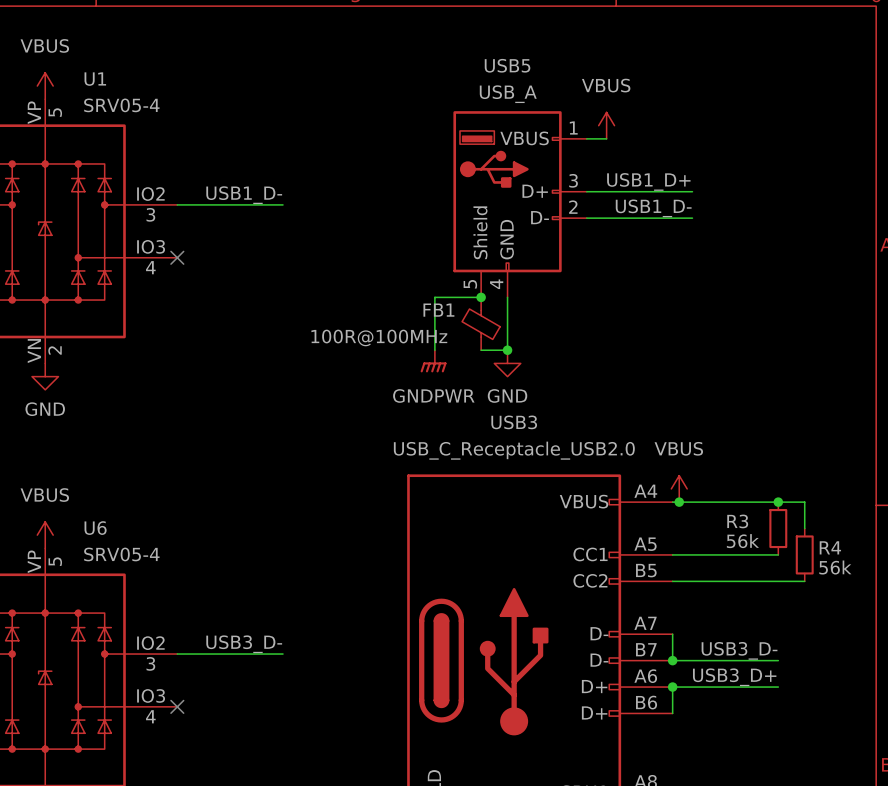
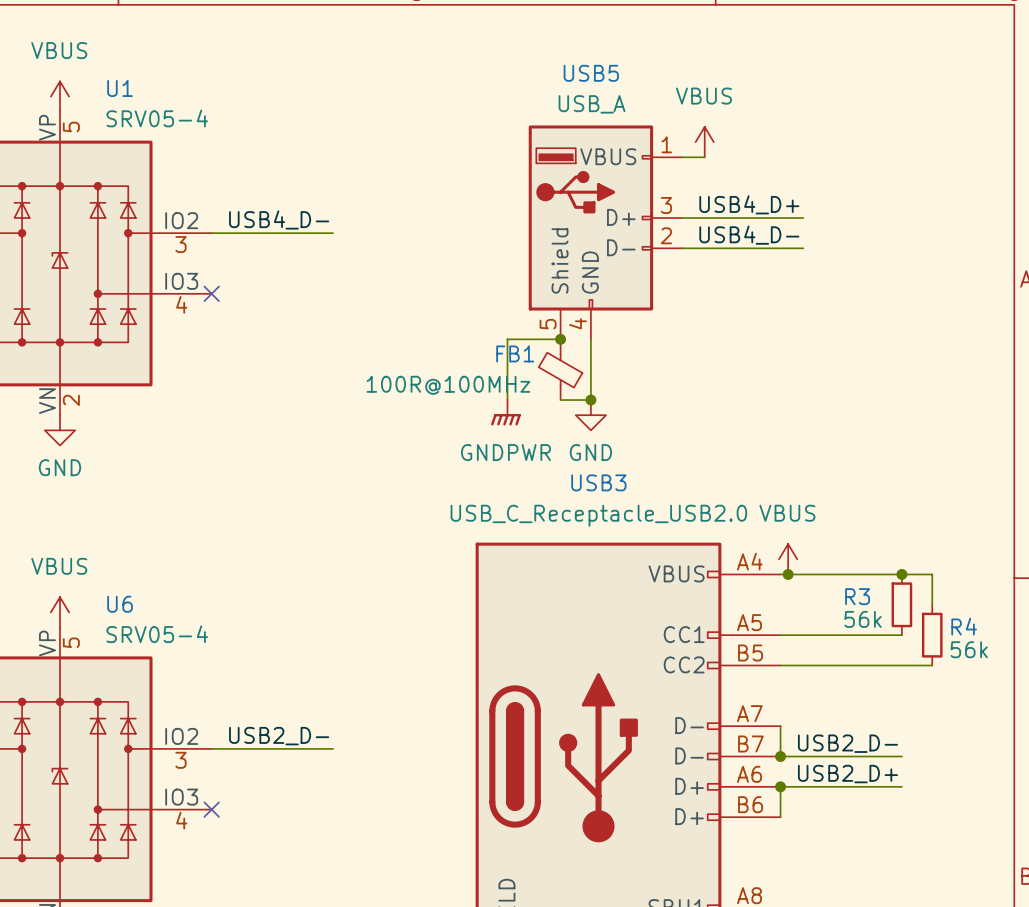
label: USB1_D+ (648, 181) -> USB4_D+ (749, 204)
label: USB1_D- (244, 195) -> USB4_D- (279, 219)
label: USB1_D- (653, 208) -> USB4_D- (749, 235)
label: USB3_D- (244, 644) -> USB2_D- (279, 736)
label: USB3_D- (739, 650) -> USB2_D- (847, 743)
label: USB3_D+ (734, 677) -> USB2_D+ (847, 774)

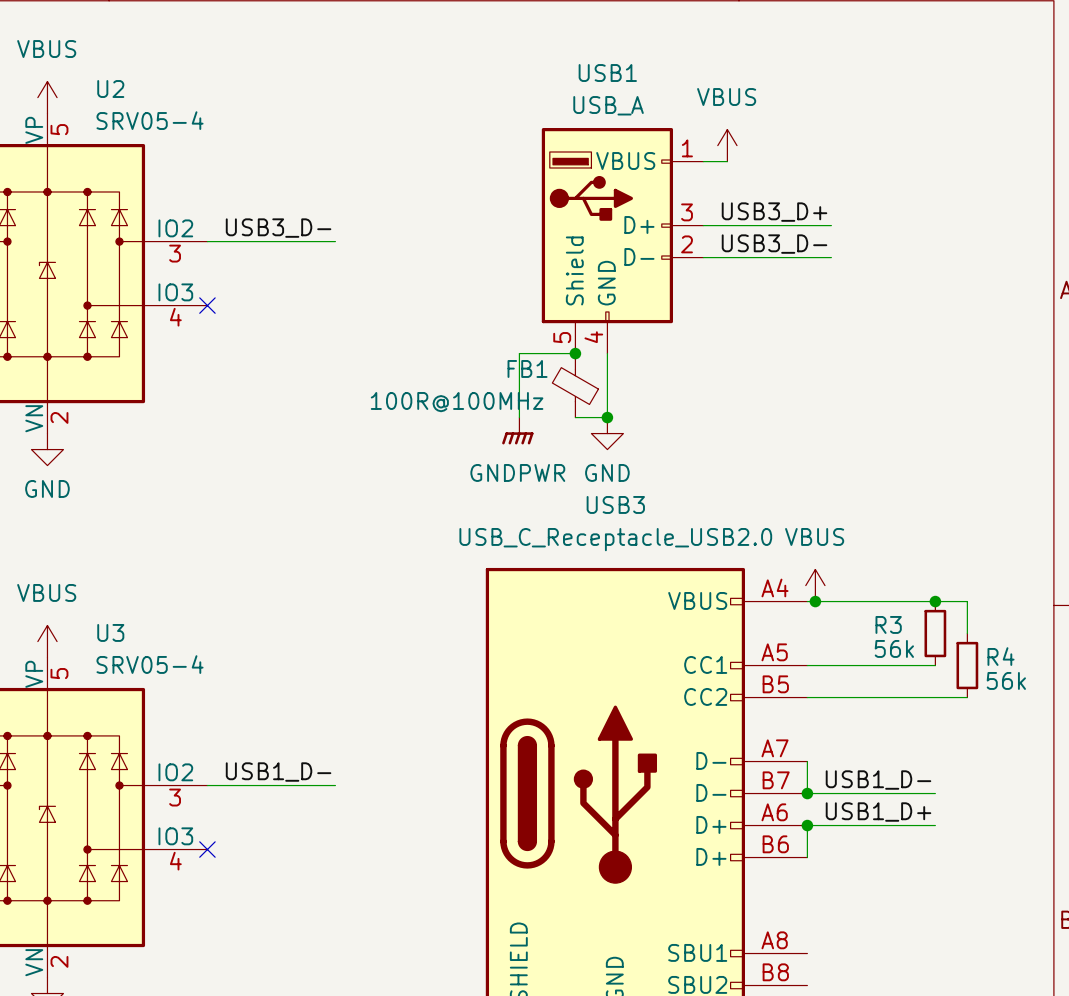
USB5 name: USB5 (591, 73) -> USB1 (607, 73)
U1 name: U1 (120, 88) -> U2 (110, 89)
label: USB4_D+ (749, 204) -> USB3_D+ (774, 212)
label: USB4_D- (279, 219) -> USB3_D- (278, 228)
label: USB4_D- (749, 235) -> USB3_D- (774, 244)
U6 name: U6 (120, 604) -> U3 (110, 632)
label: USB2_D- (279, 736) -> USB1_D- (278, 772)
label: USB2_D- (847, 743) -> USB1_D- (878, 780)
label: USB2_D+ (847, 774) -> USB1_D+ (878, 812)

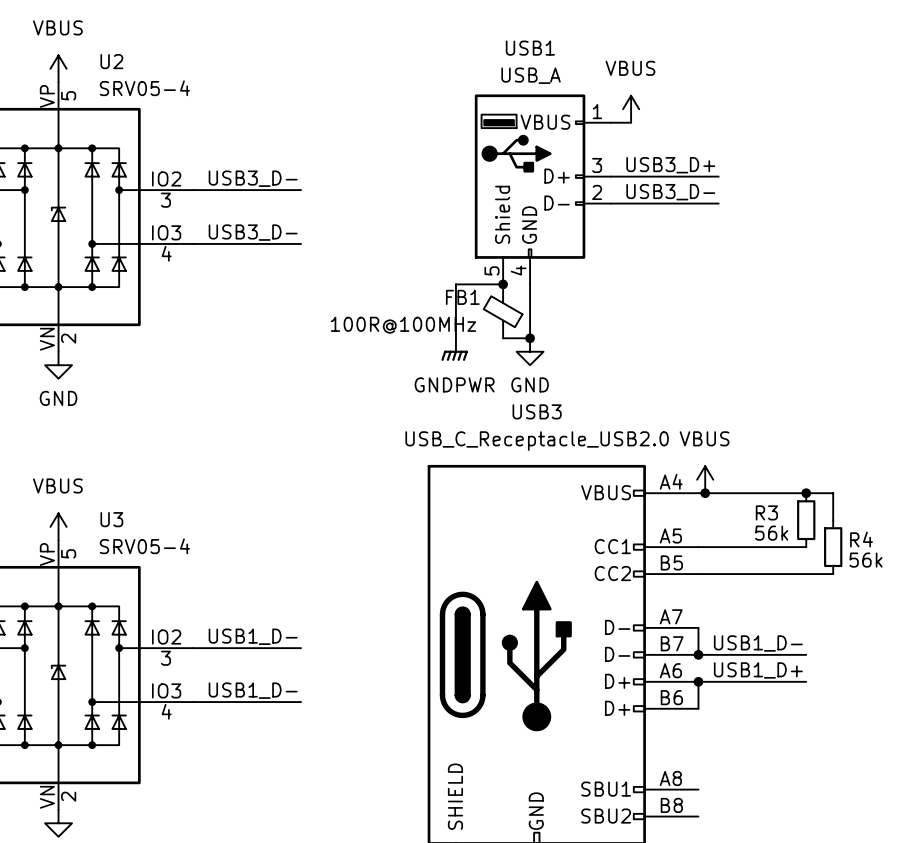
label: none -> USB3_D- (253, 232)
wire: none -> (193, 243) (301, 243)
no-connect mark: (207, 305) -> none
label: none -> USB1_D- (253, 690)
wire: none -> (193, 702) (301, 702)
no-connect mark: (207, 849) -> none

